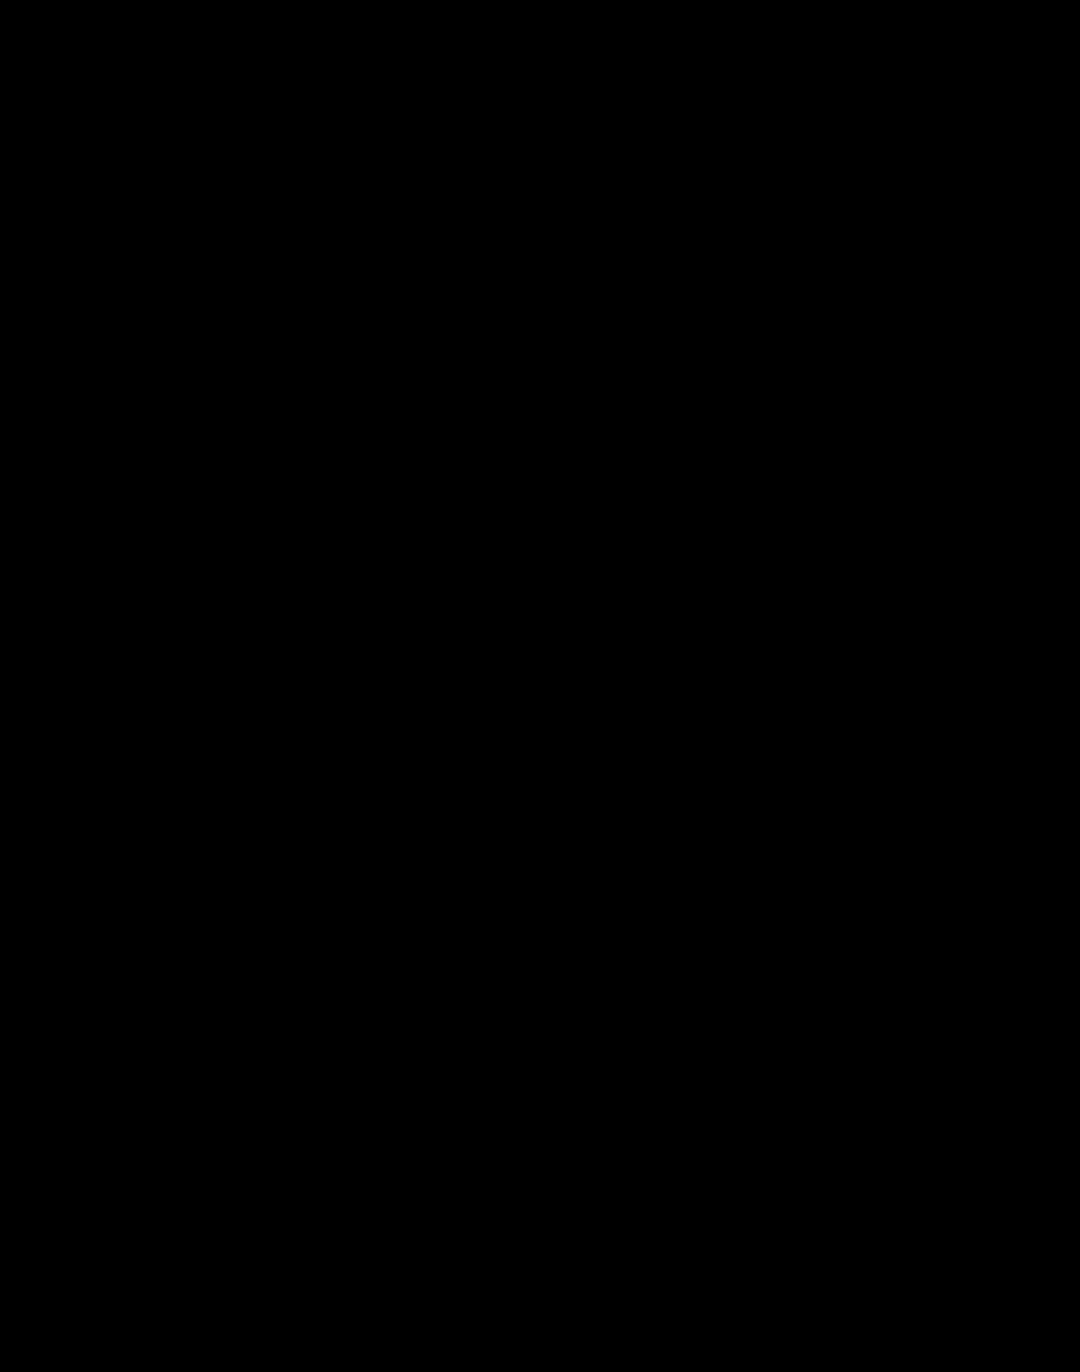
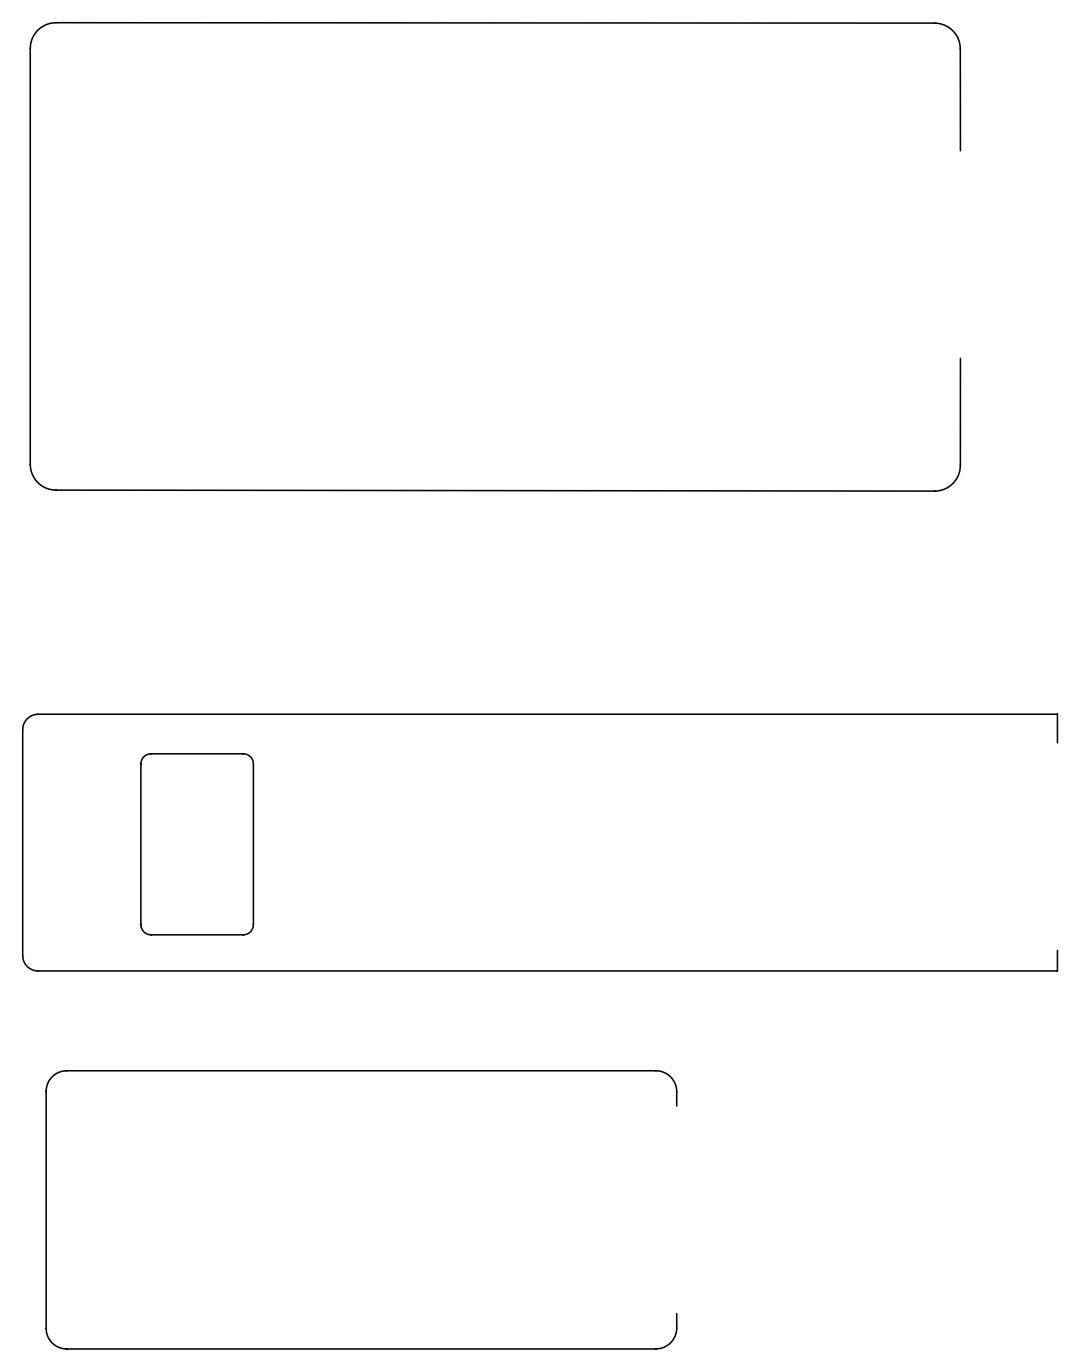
board edge: none -> (960, 150) (960, 45) (952, 30) (937, 23) (56, 22) (46, 24) (33, 35) (30, 48) (30, 467) (37, 482) (46, 488) (56, 490) (937, 490) (952, 483) (959, 471) (960, 358)
board edge: none -> (1057, 714) (1057, 742)
board edge: none -> (1057, 714) (34, 714) (26, 720) (22, 729) (22, 955) (27, 966) (38, 970) (1057, 970) (1057, 950)
board edge: none -> (151, 753) (244, 753) (252, 759) (253, 924) (251, 930) (247, 933) (151, 934) (145, 933) (141, 929) (140, 764) (143, 756) (151, 753)
board edge: none -> (676, 1091) (675, 1083) (670, 1076) (663, 1072) (655, 1070) (66, 1070) (58, 1072) (50, 1078) (46, 1091) (46, 1328) (47, 1336) (52, 1342) (58, 1347) (66, 1348) (655, 1348) (663, 1347) (670, 1342) (675, 1336) (676, 1328)
board edge: none -> (676, 1091) (676, 1106)
board edge: none -> (676, 1313) (676, 1328)

